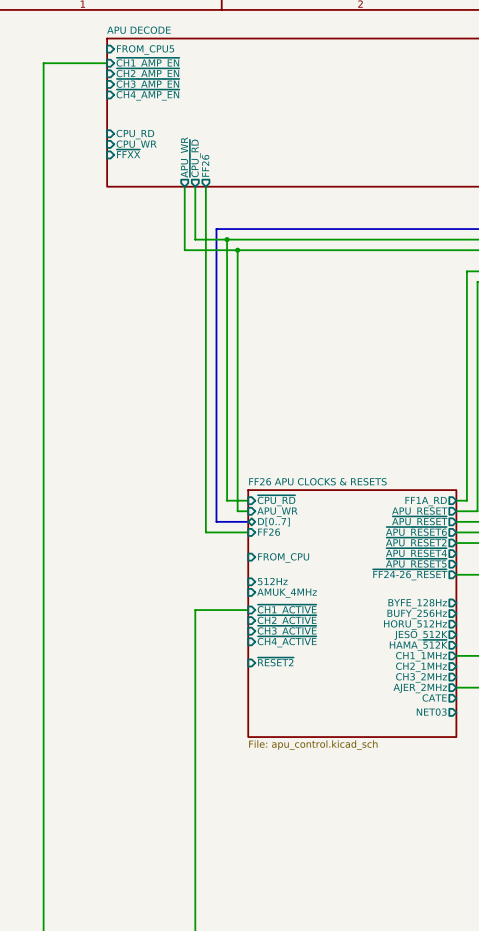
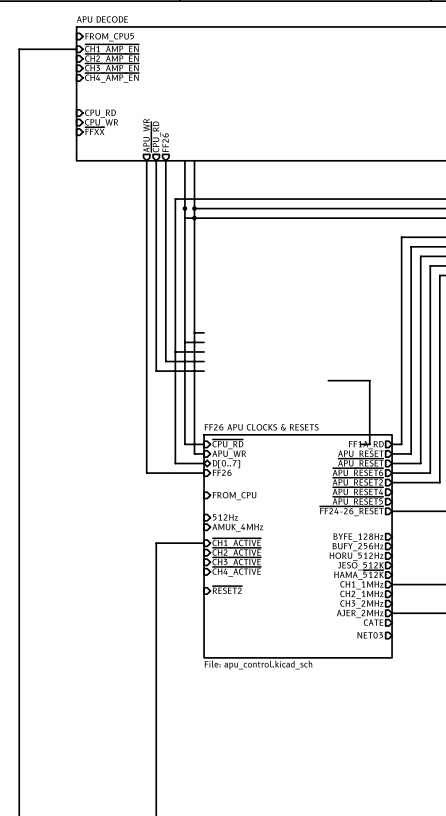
wire: none -> (184, 160) (184, 208)
wire: none -> (194, 160) (194, 218)
wire: (195, 239) (237, 239) -> (156, 208) (156, 371) (204, 371)
junction: none -> (194, 208)
wire: (184, 250) (227, 250) -> (146, 218) (146, 473) (165, 473)
wire: none -> (194, 332) (204, 332)
wire: none -> (184, 342) (204, 342)
bus: none -> (175, 351) (204, 351)
wire: (205, 408) (205, 532) -> (165, 361) (204, 361)
wire: none -> (328, 380) (369, 380) (369, 444) (360, 444)

